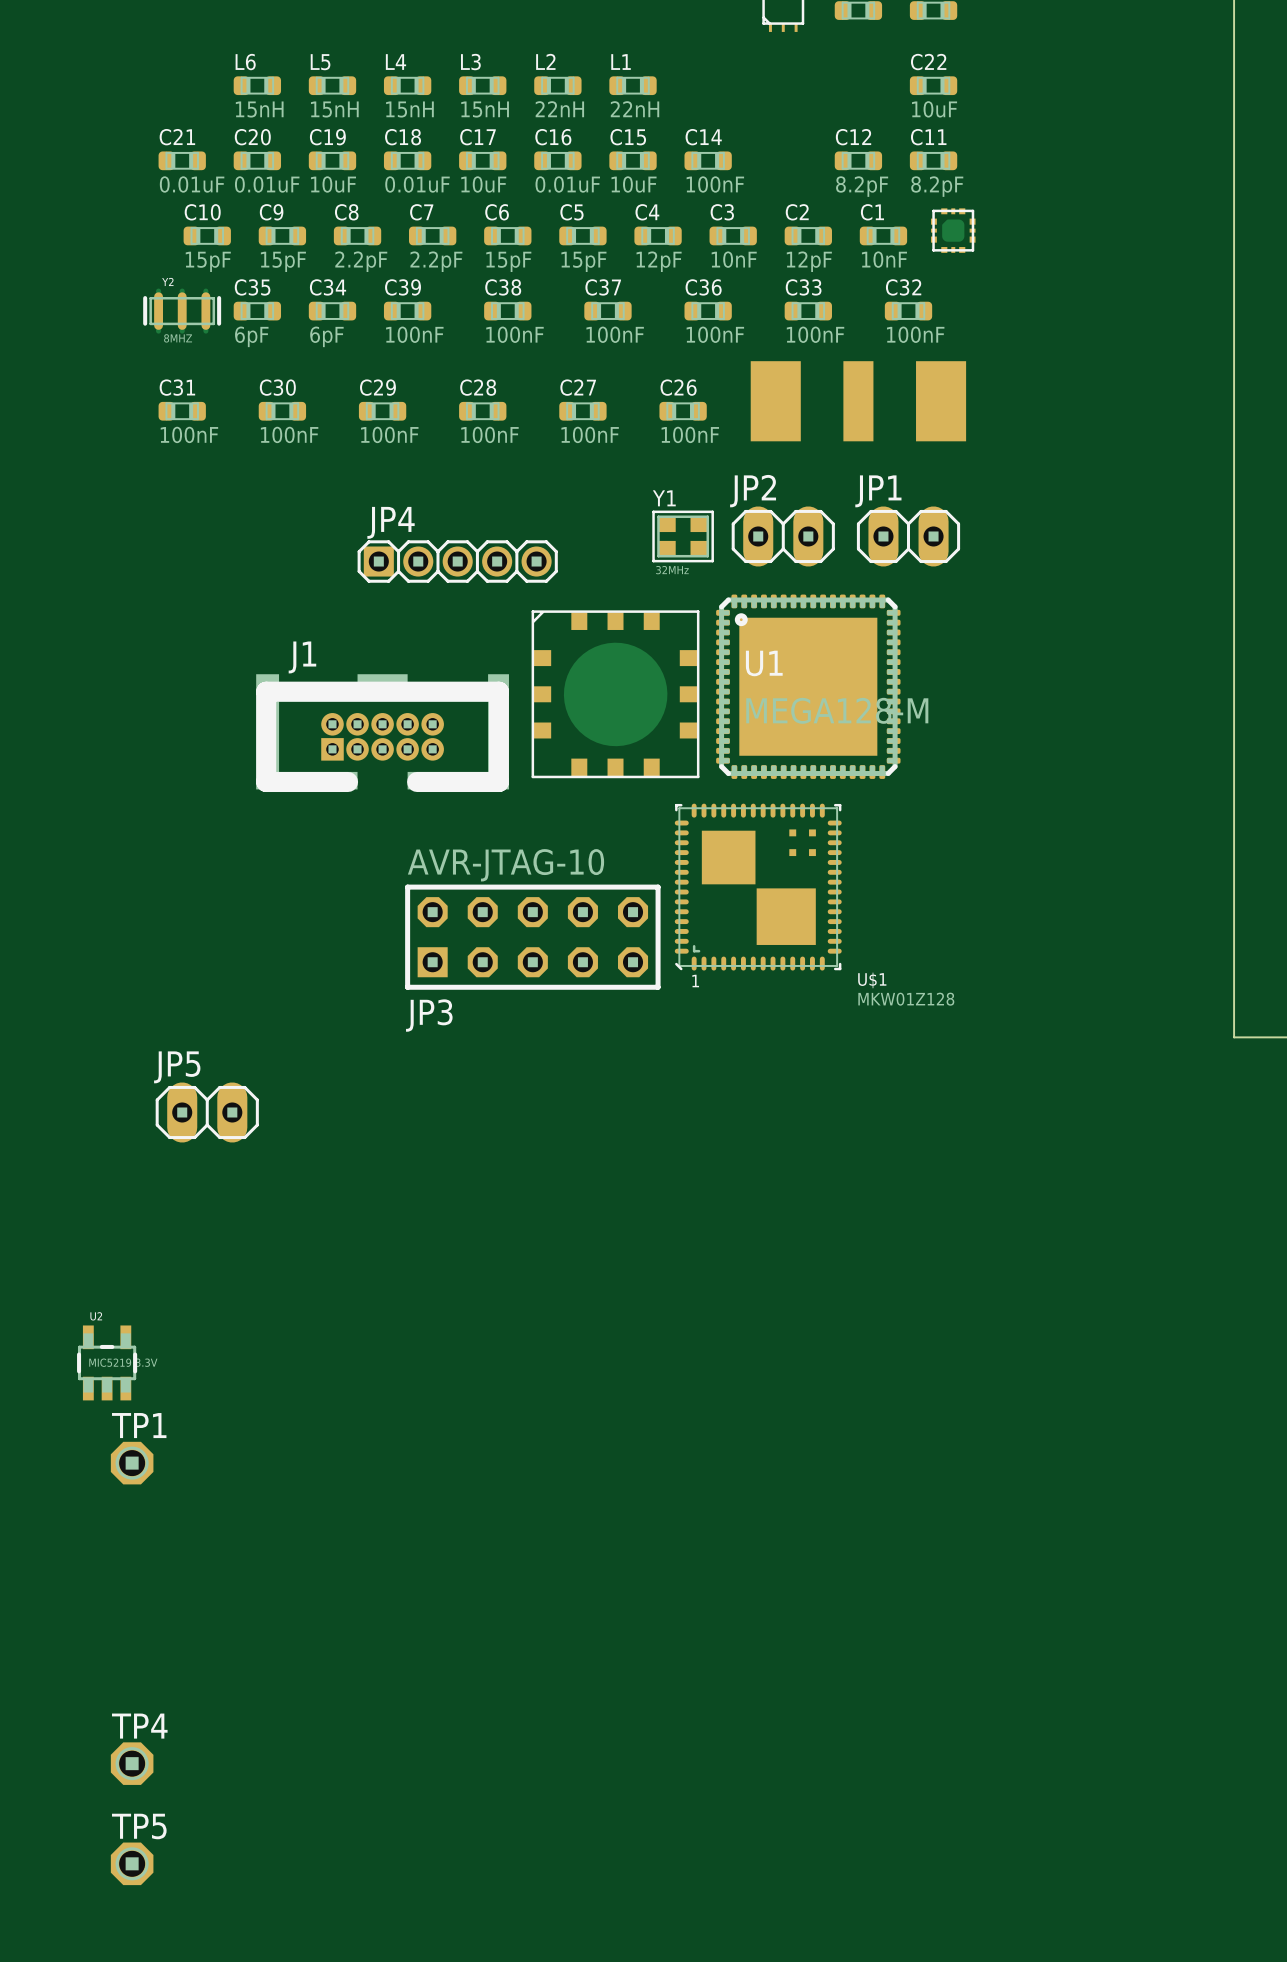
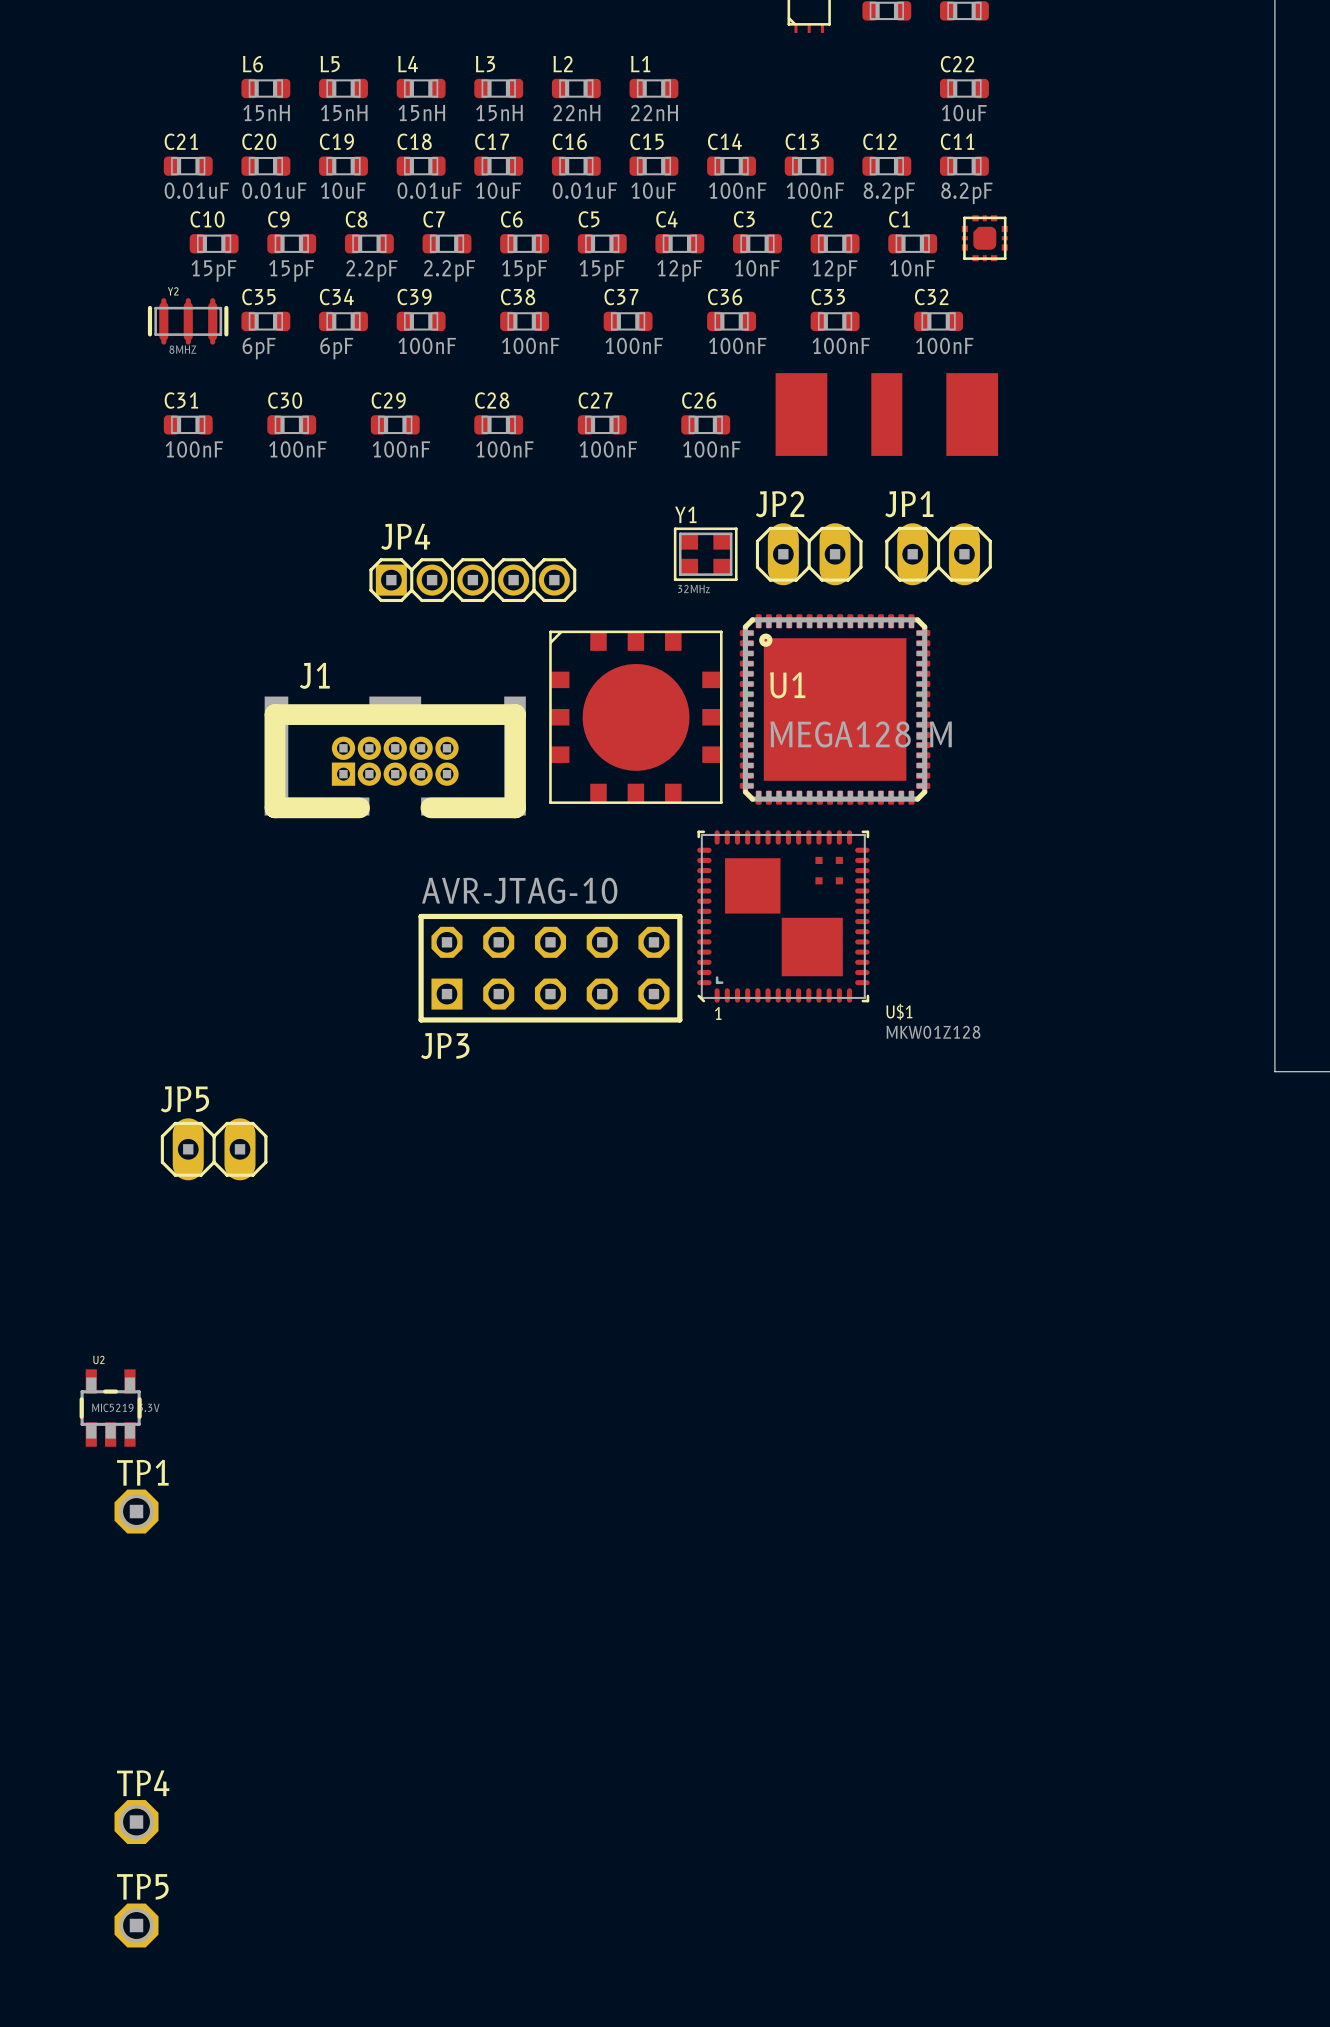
C13: none -> 100nF (809, 166)

